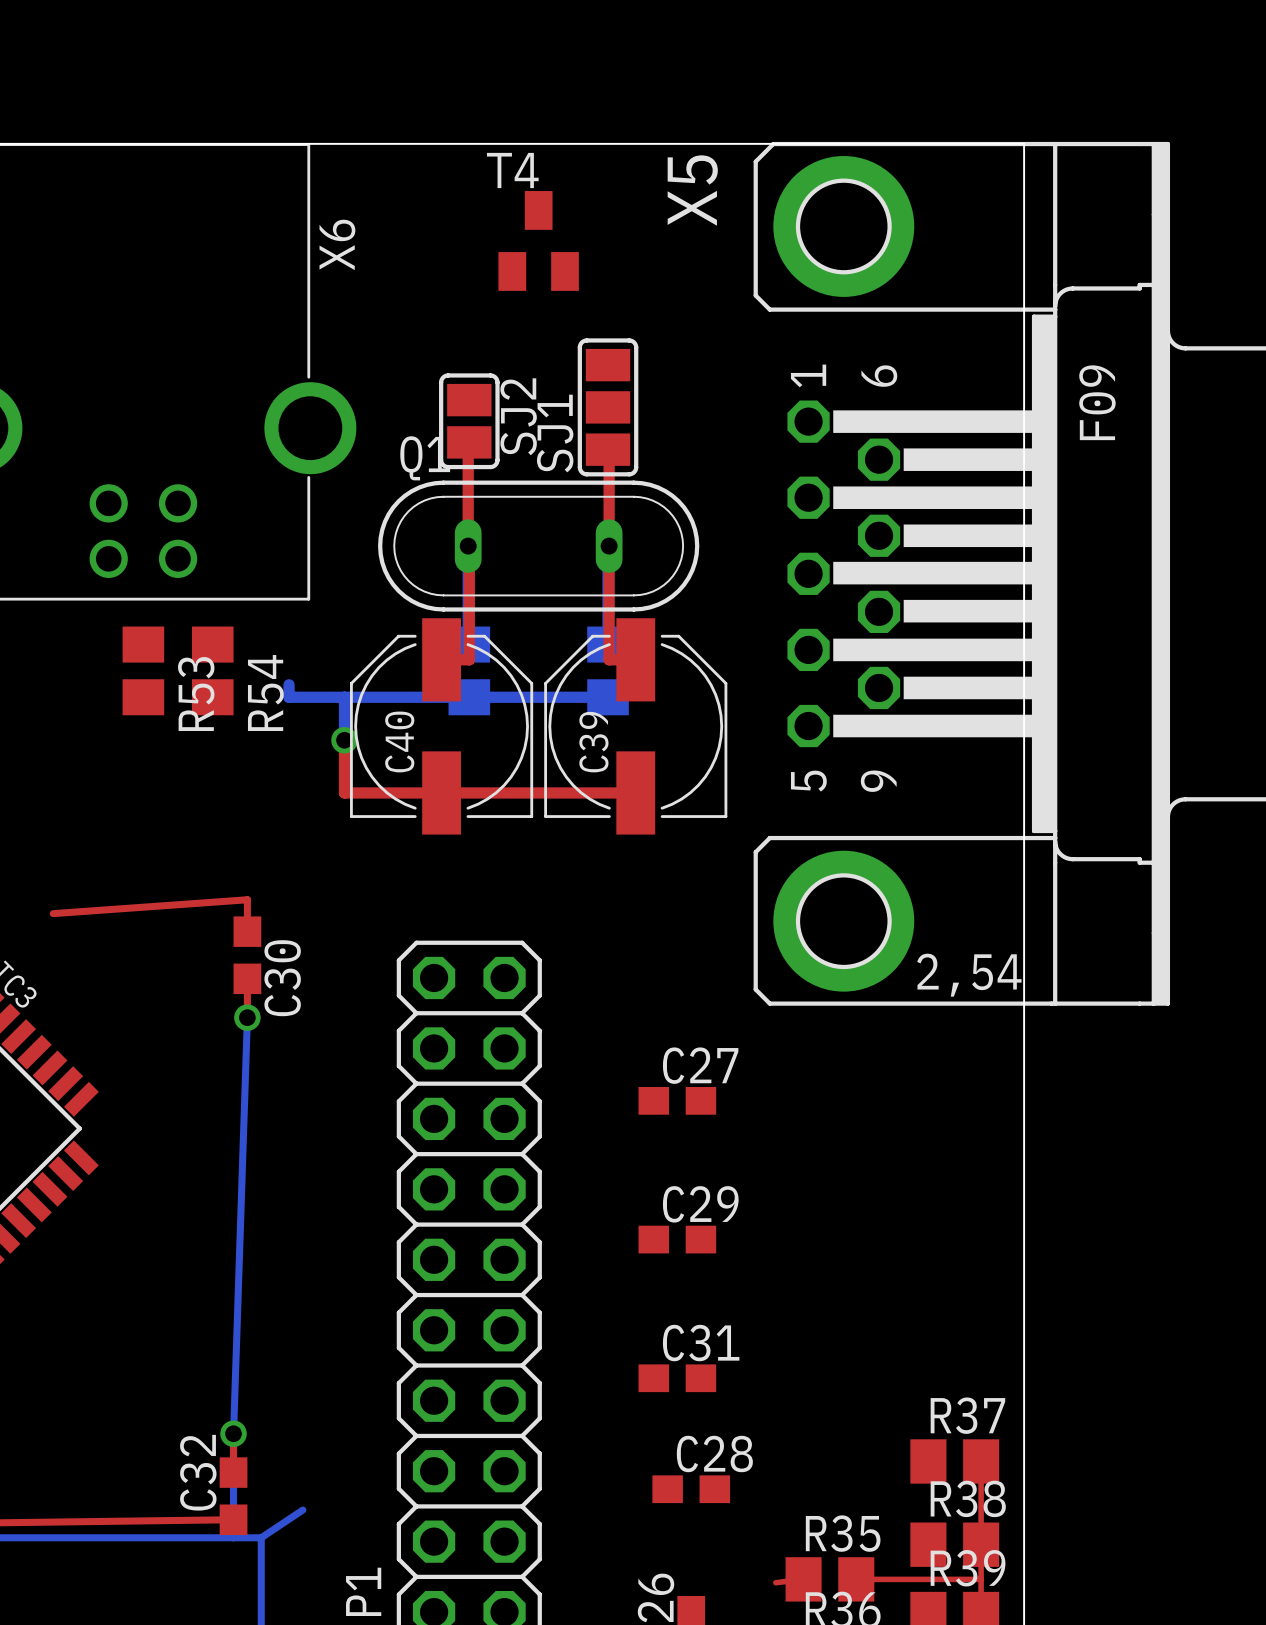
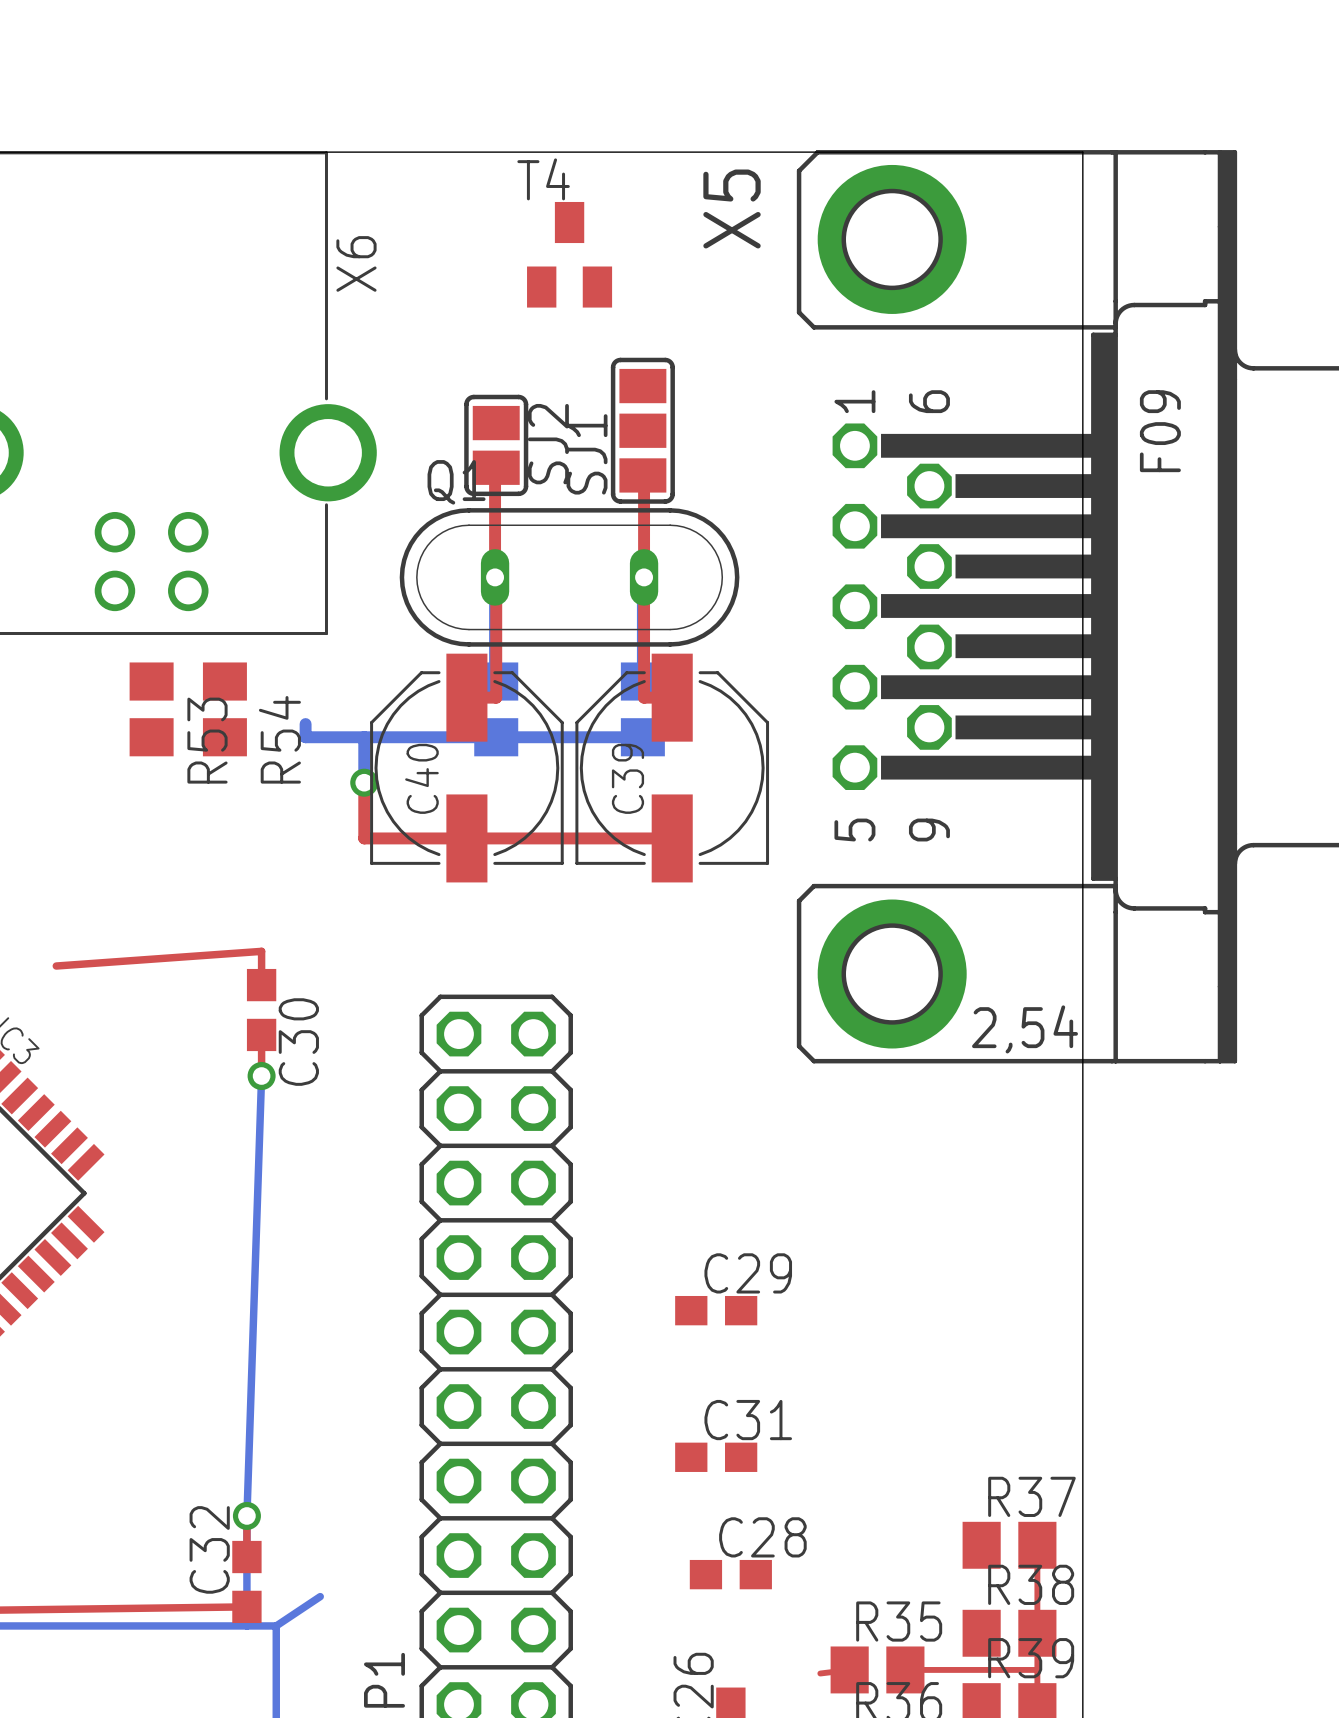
C27: (677, 1100) -> none

